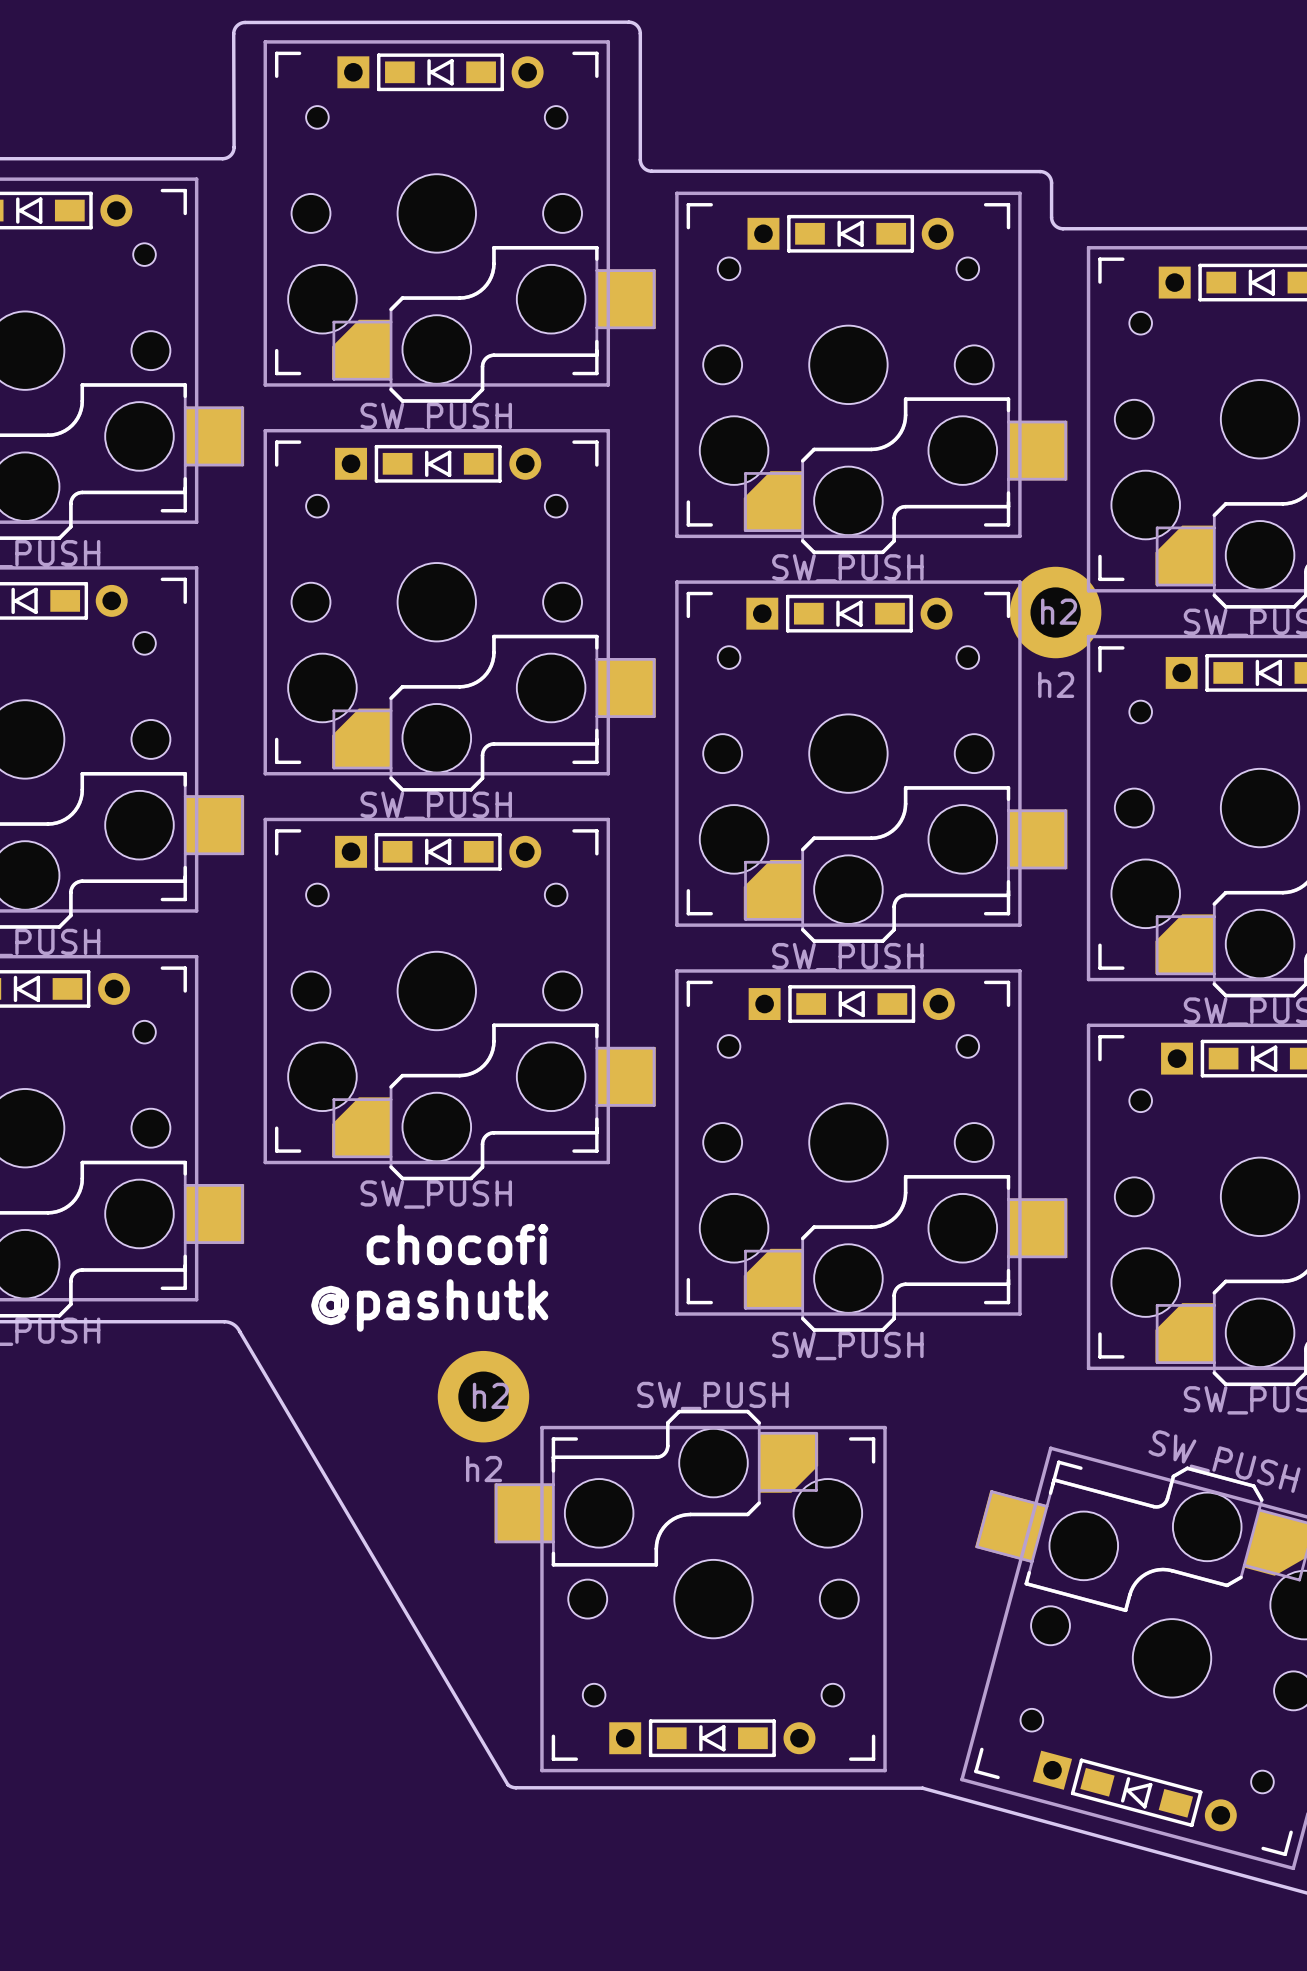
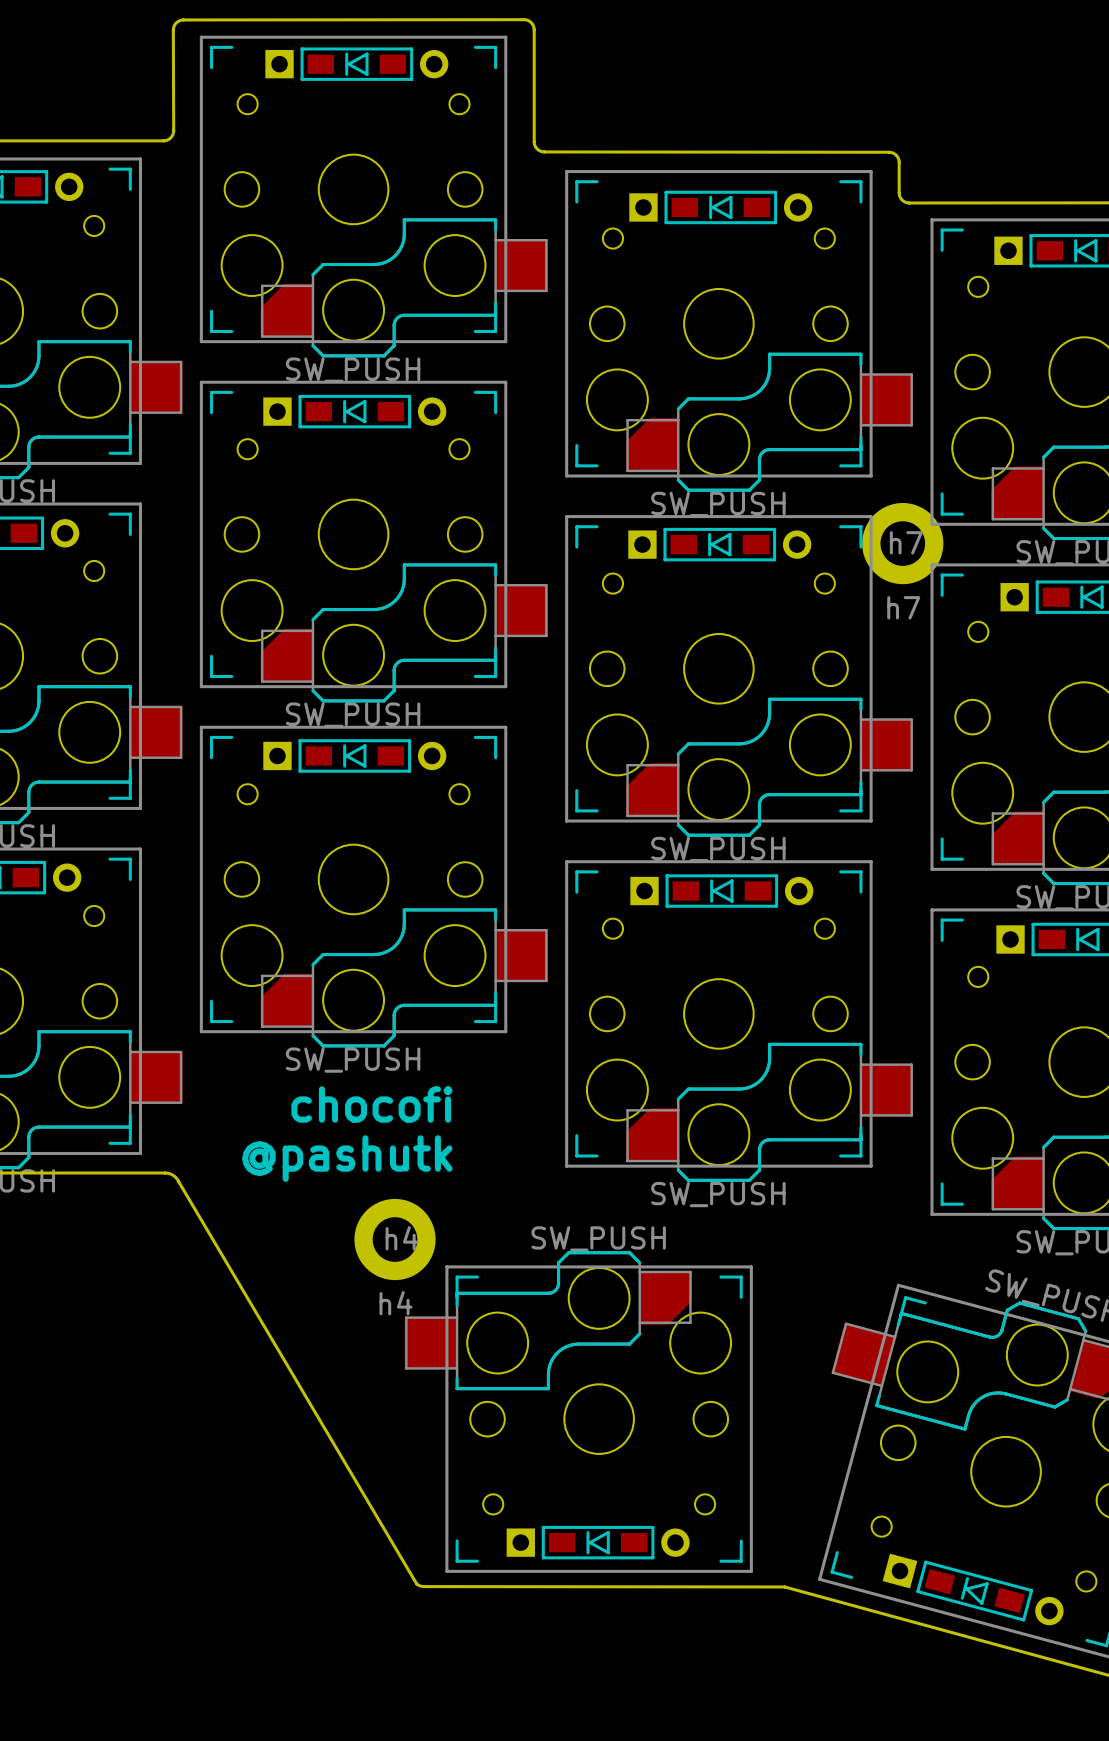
h2 name: h2 (1059, 611) -> h7 (906, 542)
h2 value: h2 (1056, 684) -> h7 (903, 607)
h2 name: h2 (490, 1395) -> h4 (402, 1238)
h2 value: h2 (484, 1469) -> h4 (395, 1303)

